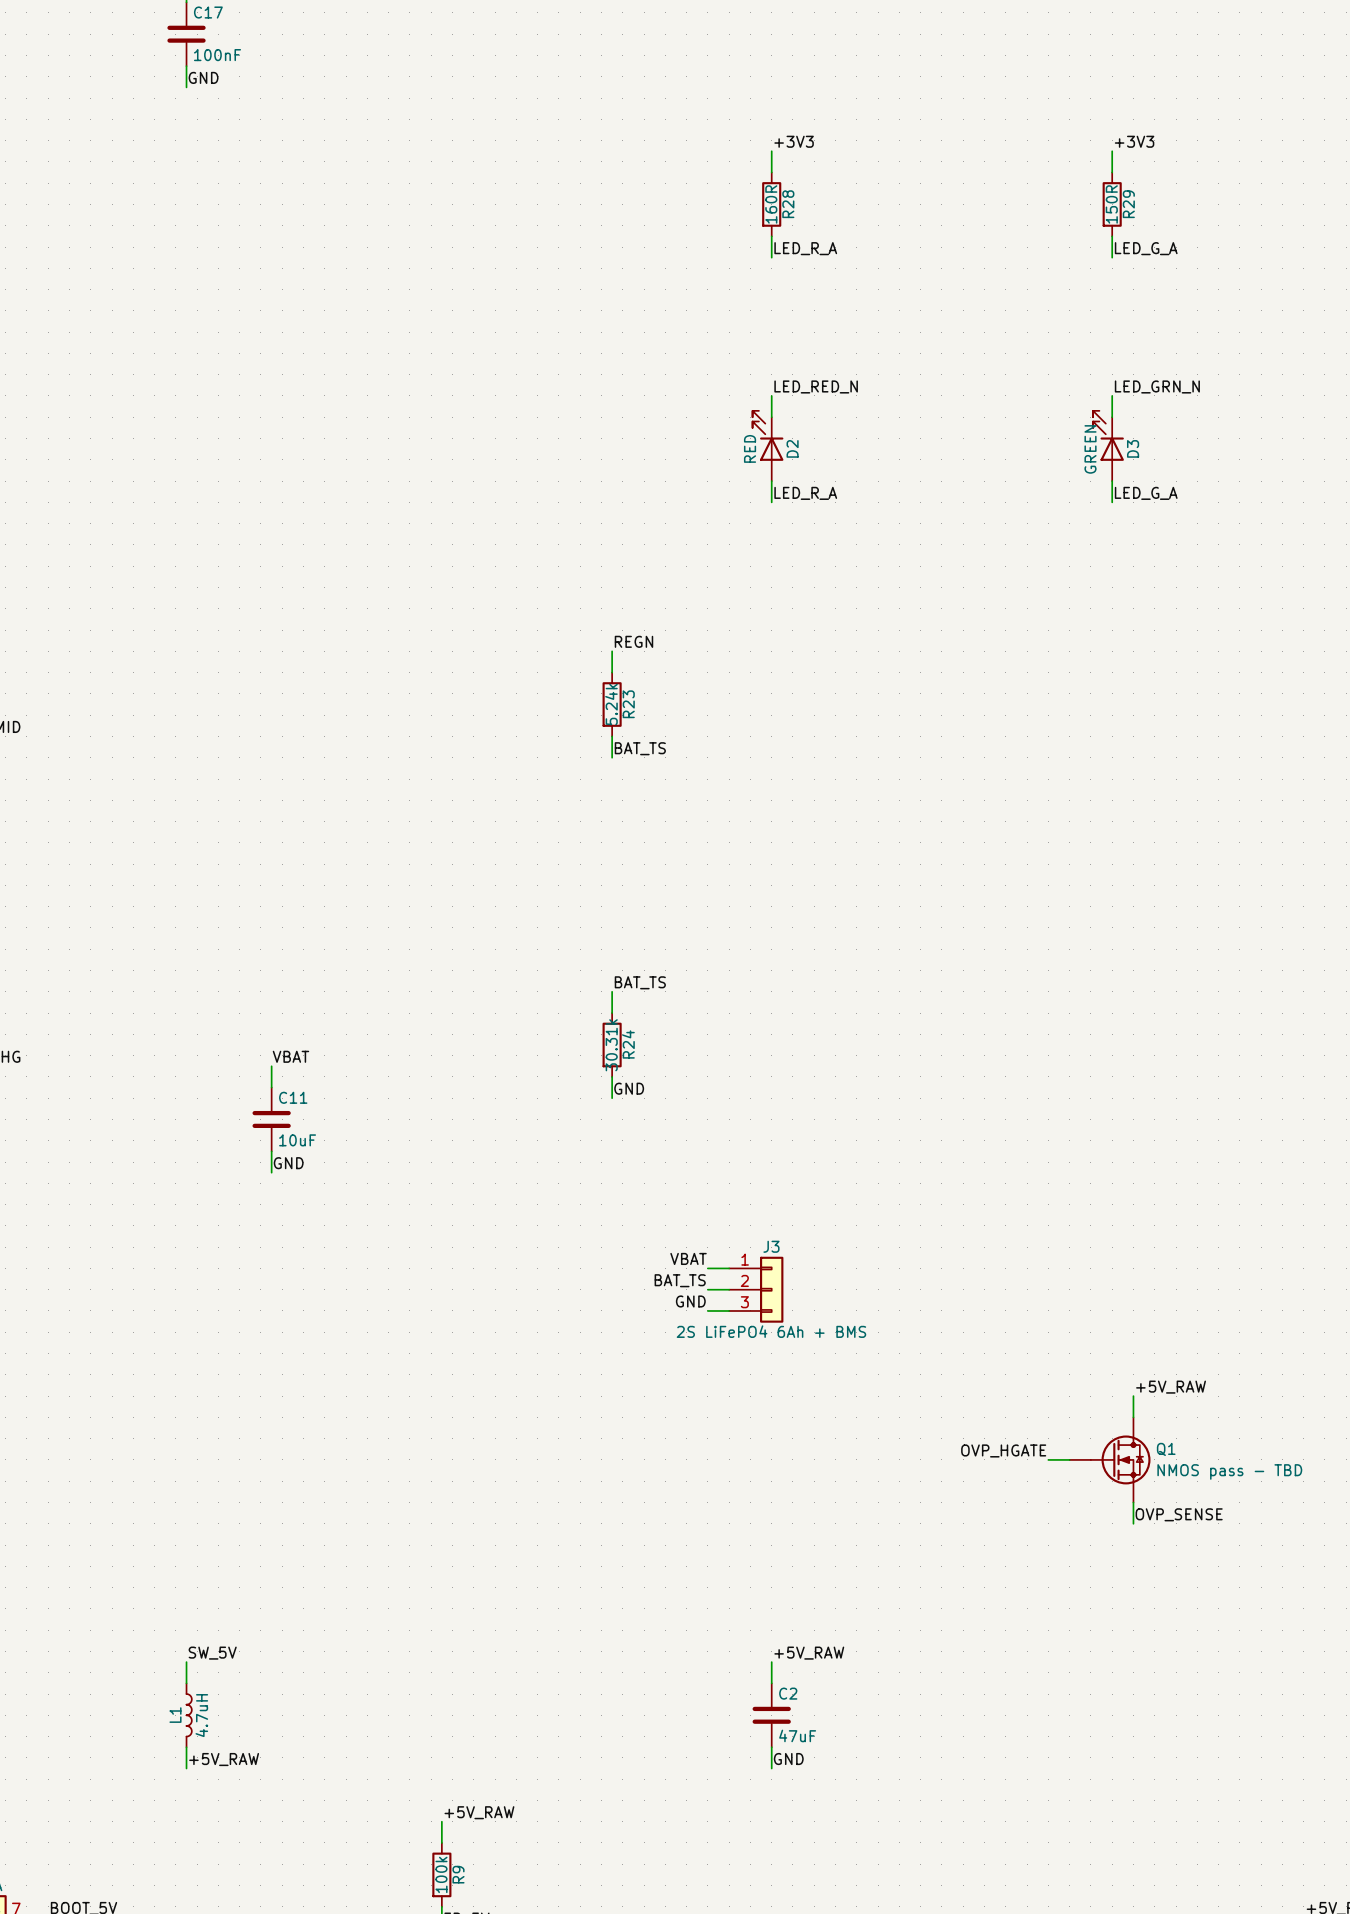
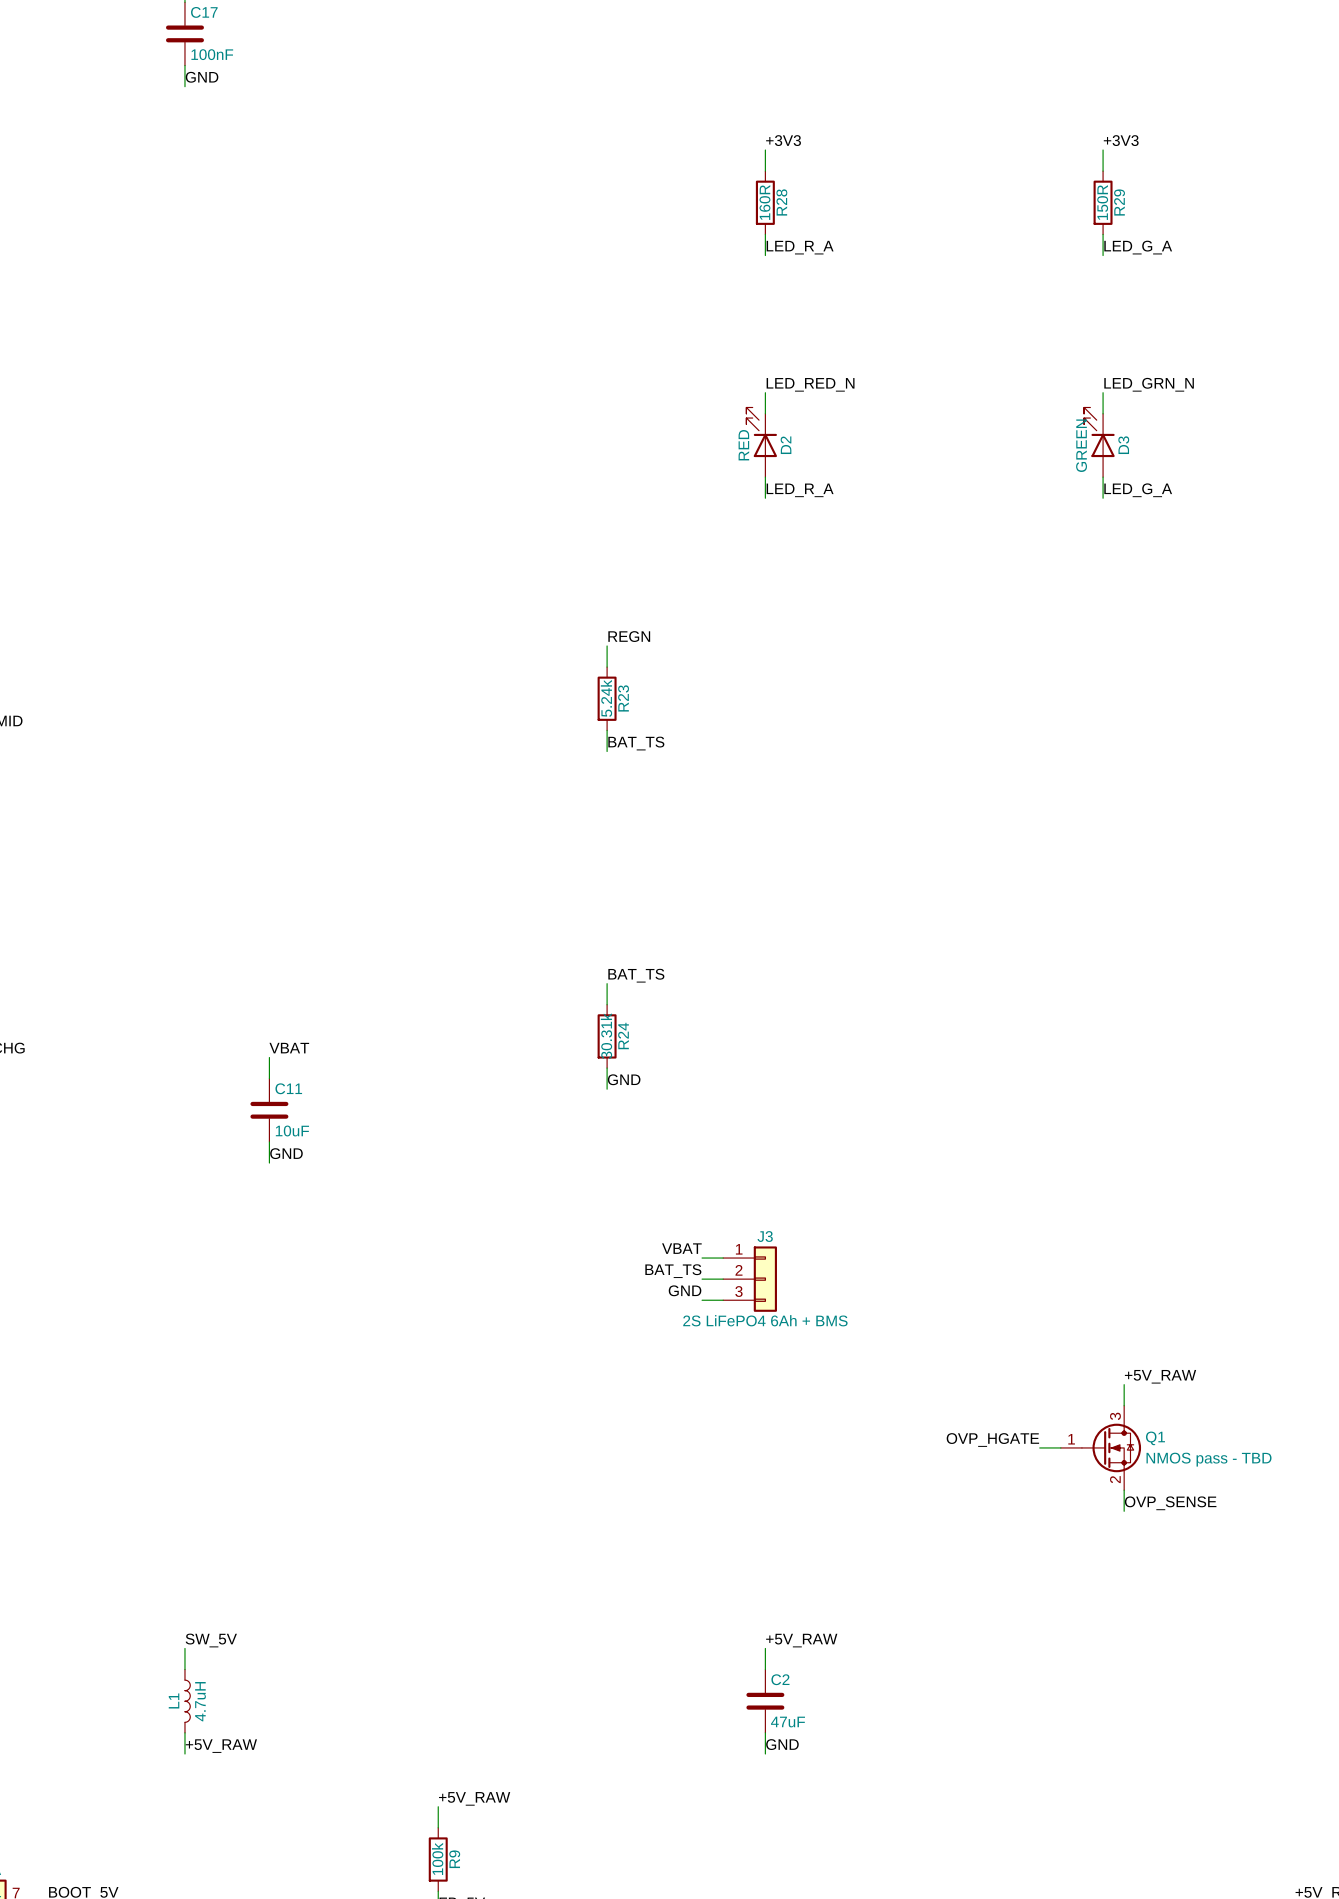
Q1 pin number: none -> 3 (1115, 1416)
Q1 pin number: none -> 1 (1071, 1439)
Q1 pin number: none -> 2 (1115, 1479)

